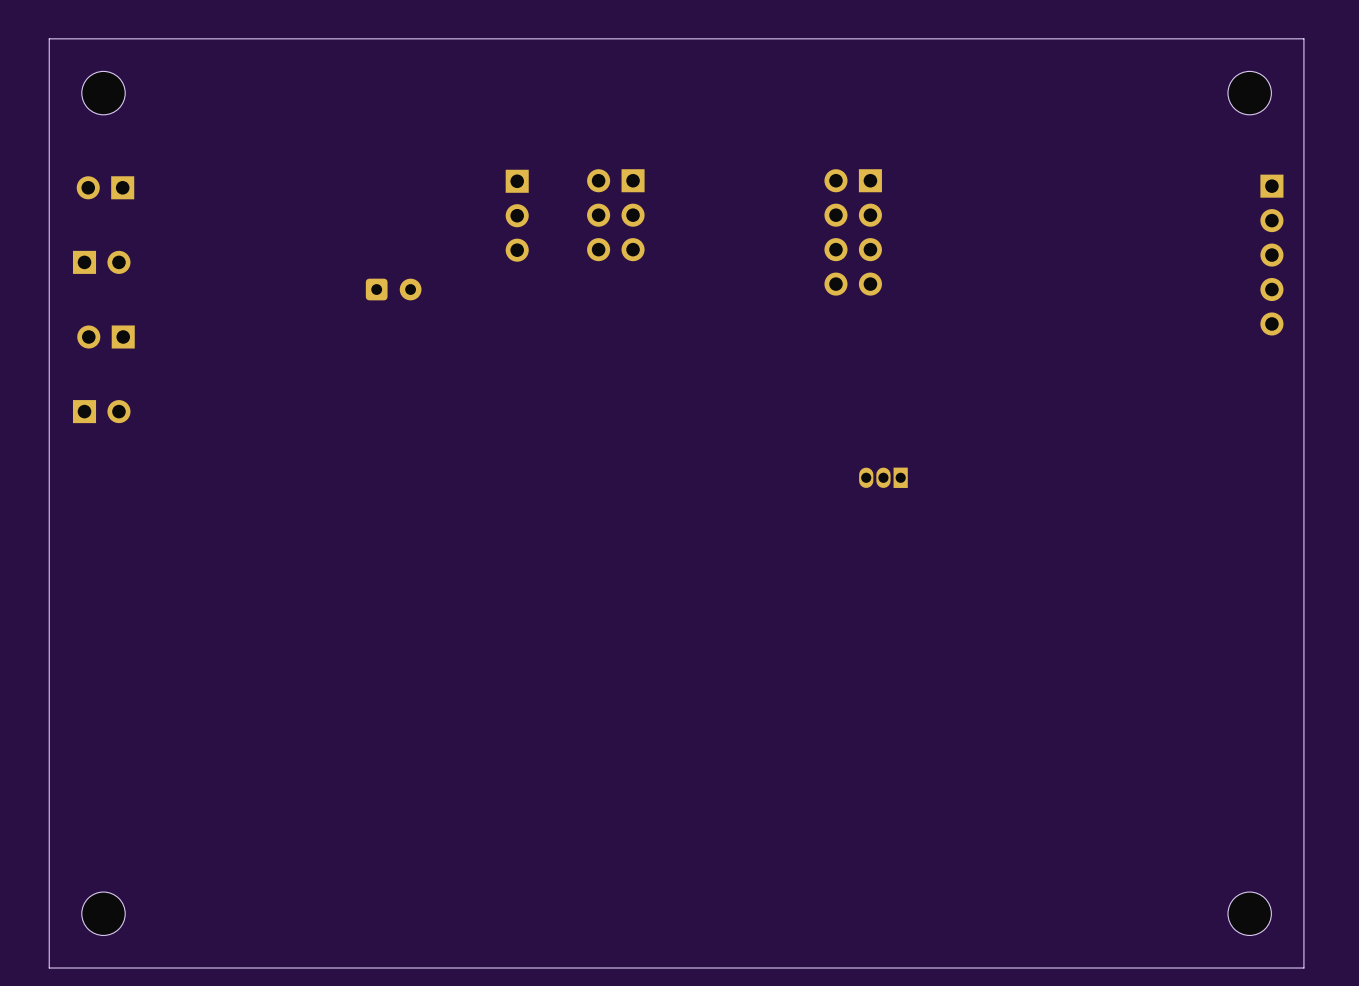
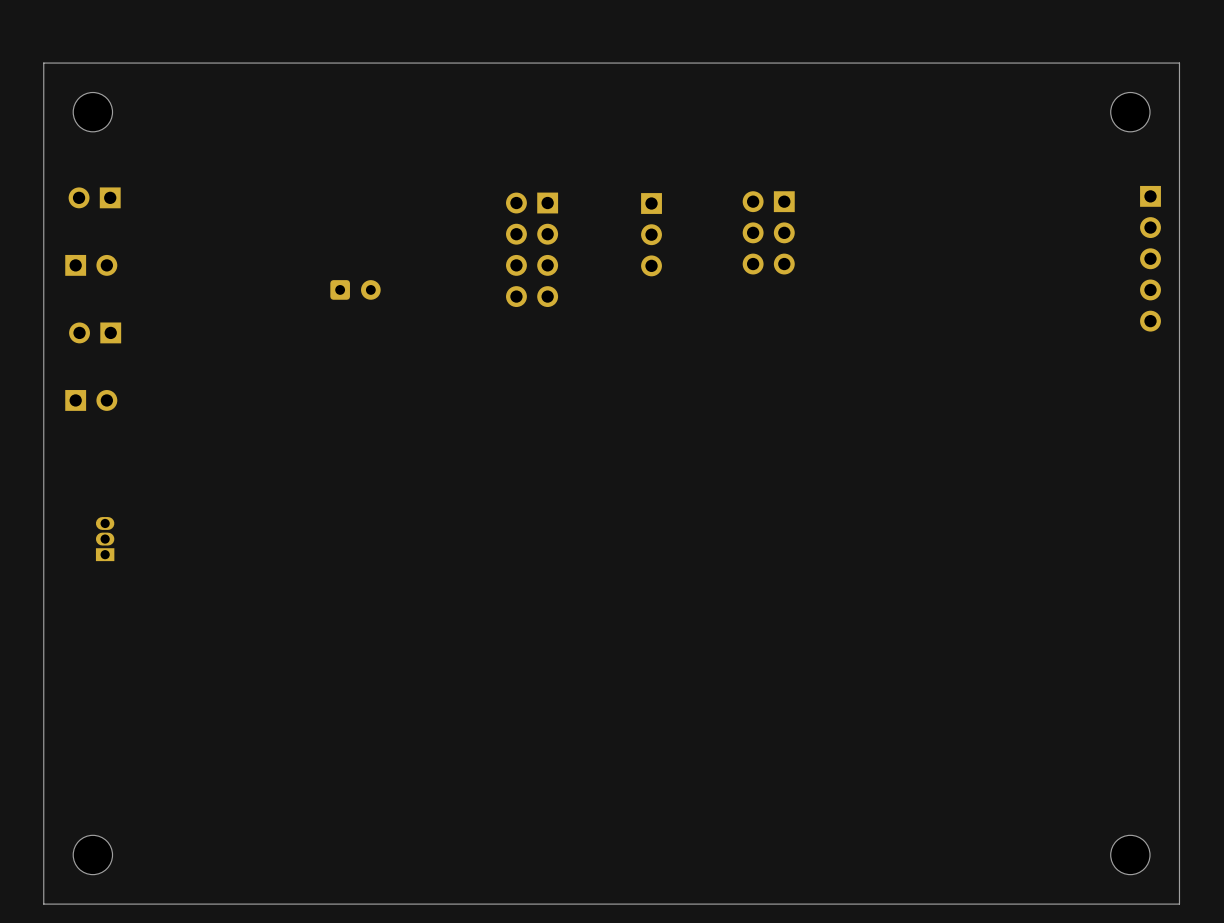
part footprint: [824, 169, 882, 296] -> [742, 191, 795, 275]
part position: (517, 215) -> (651, 234)
part: (615, 215) -> none
part: none -> (532, 249)
part: (883, 477) -> none
part: none -> (105, 539)

